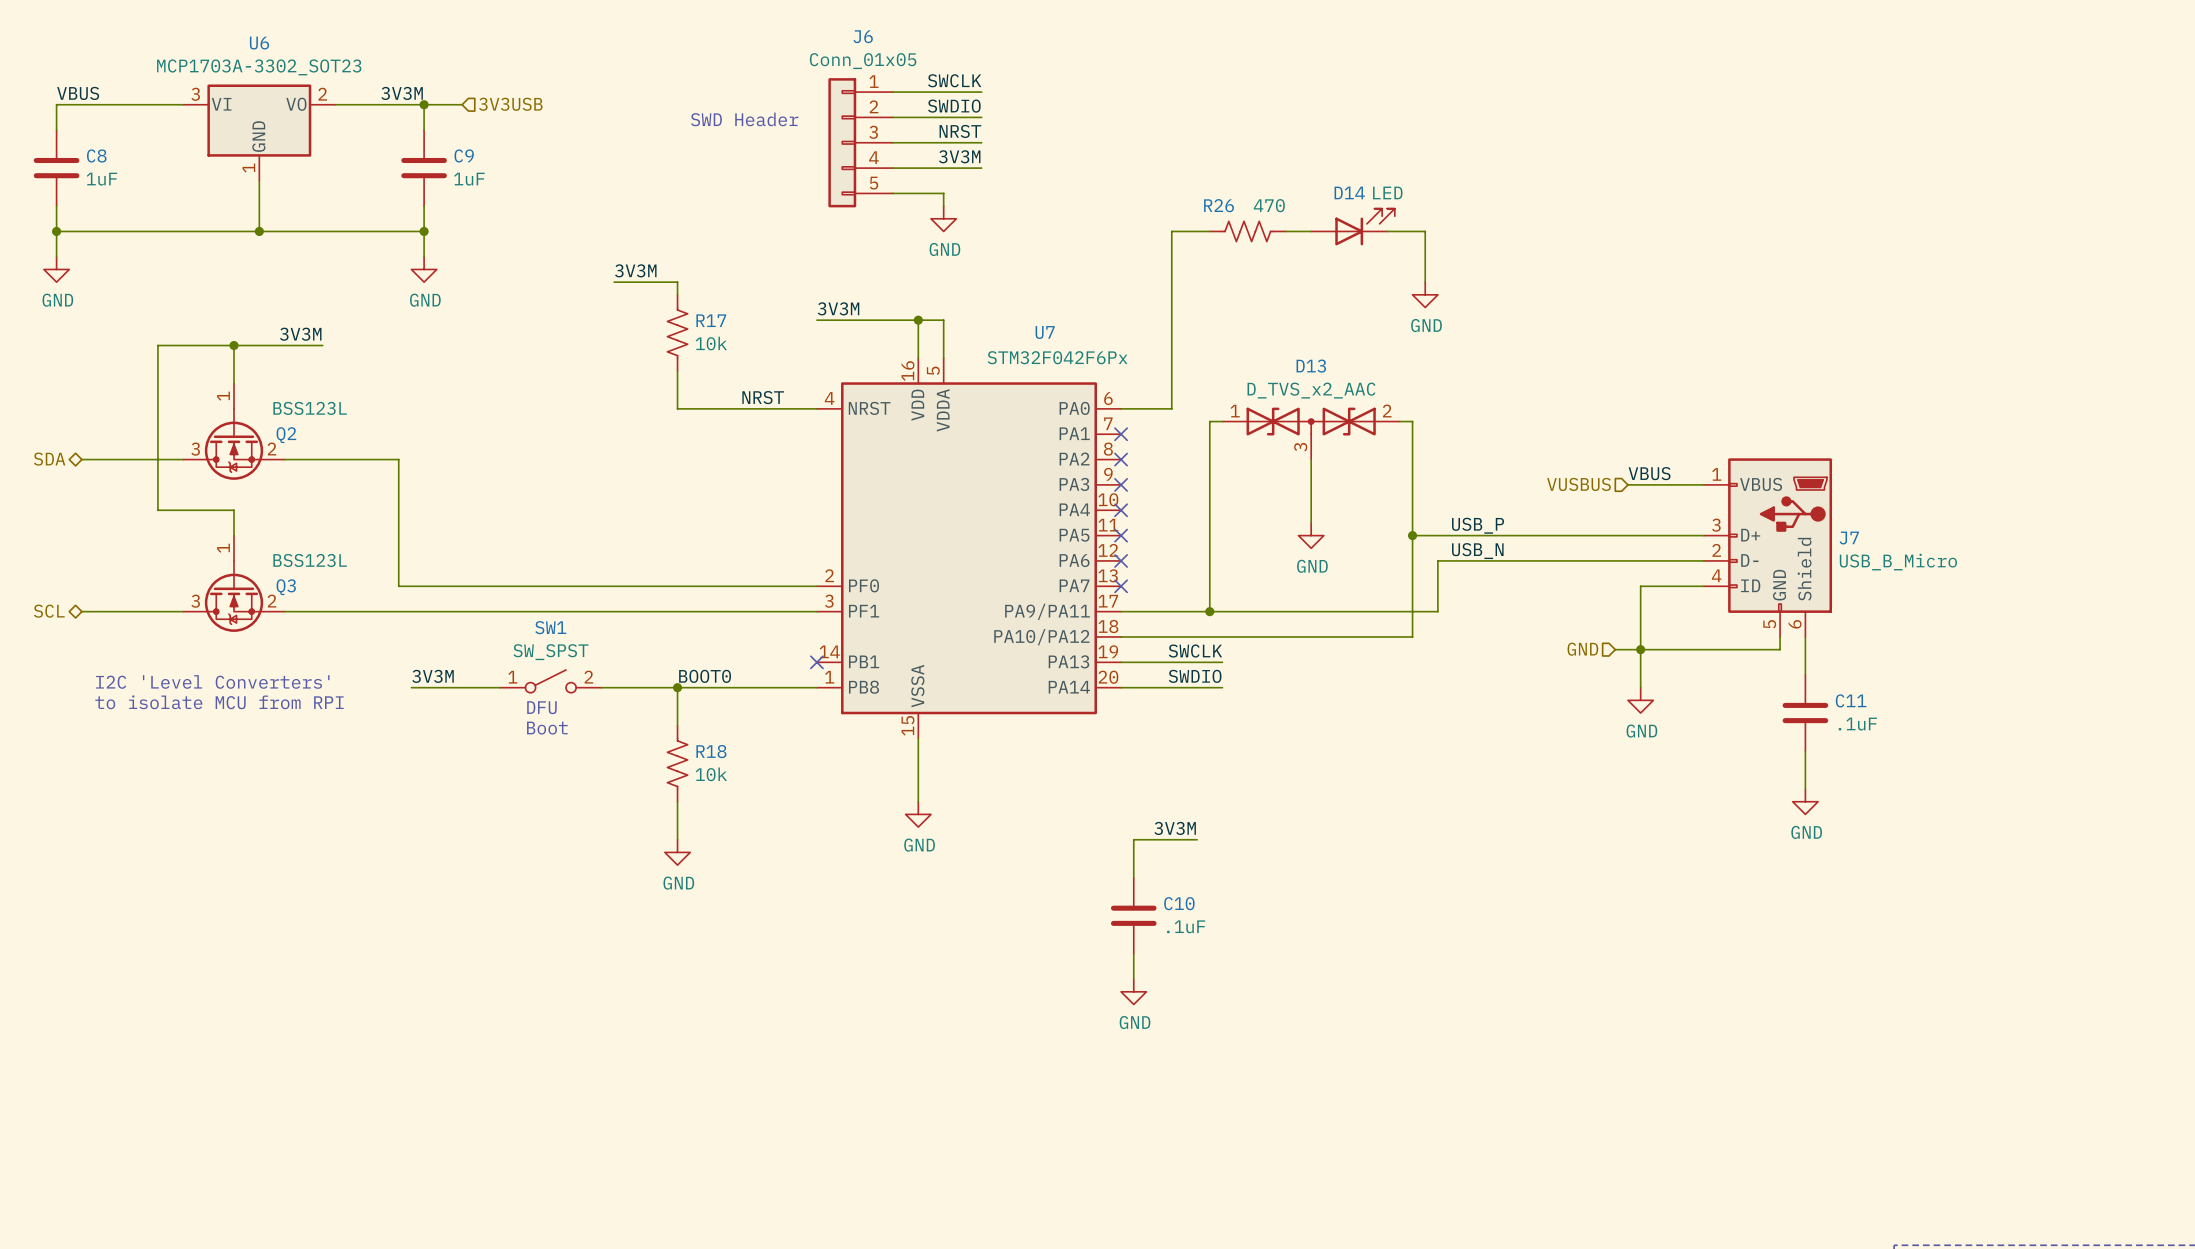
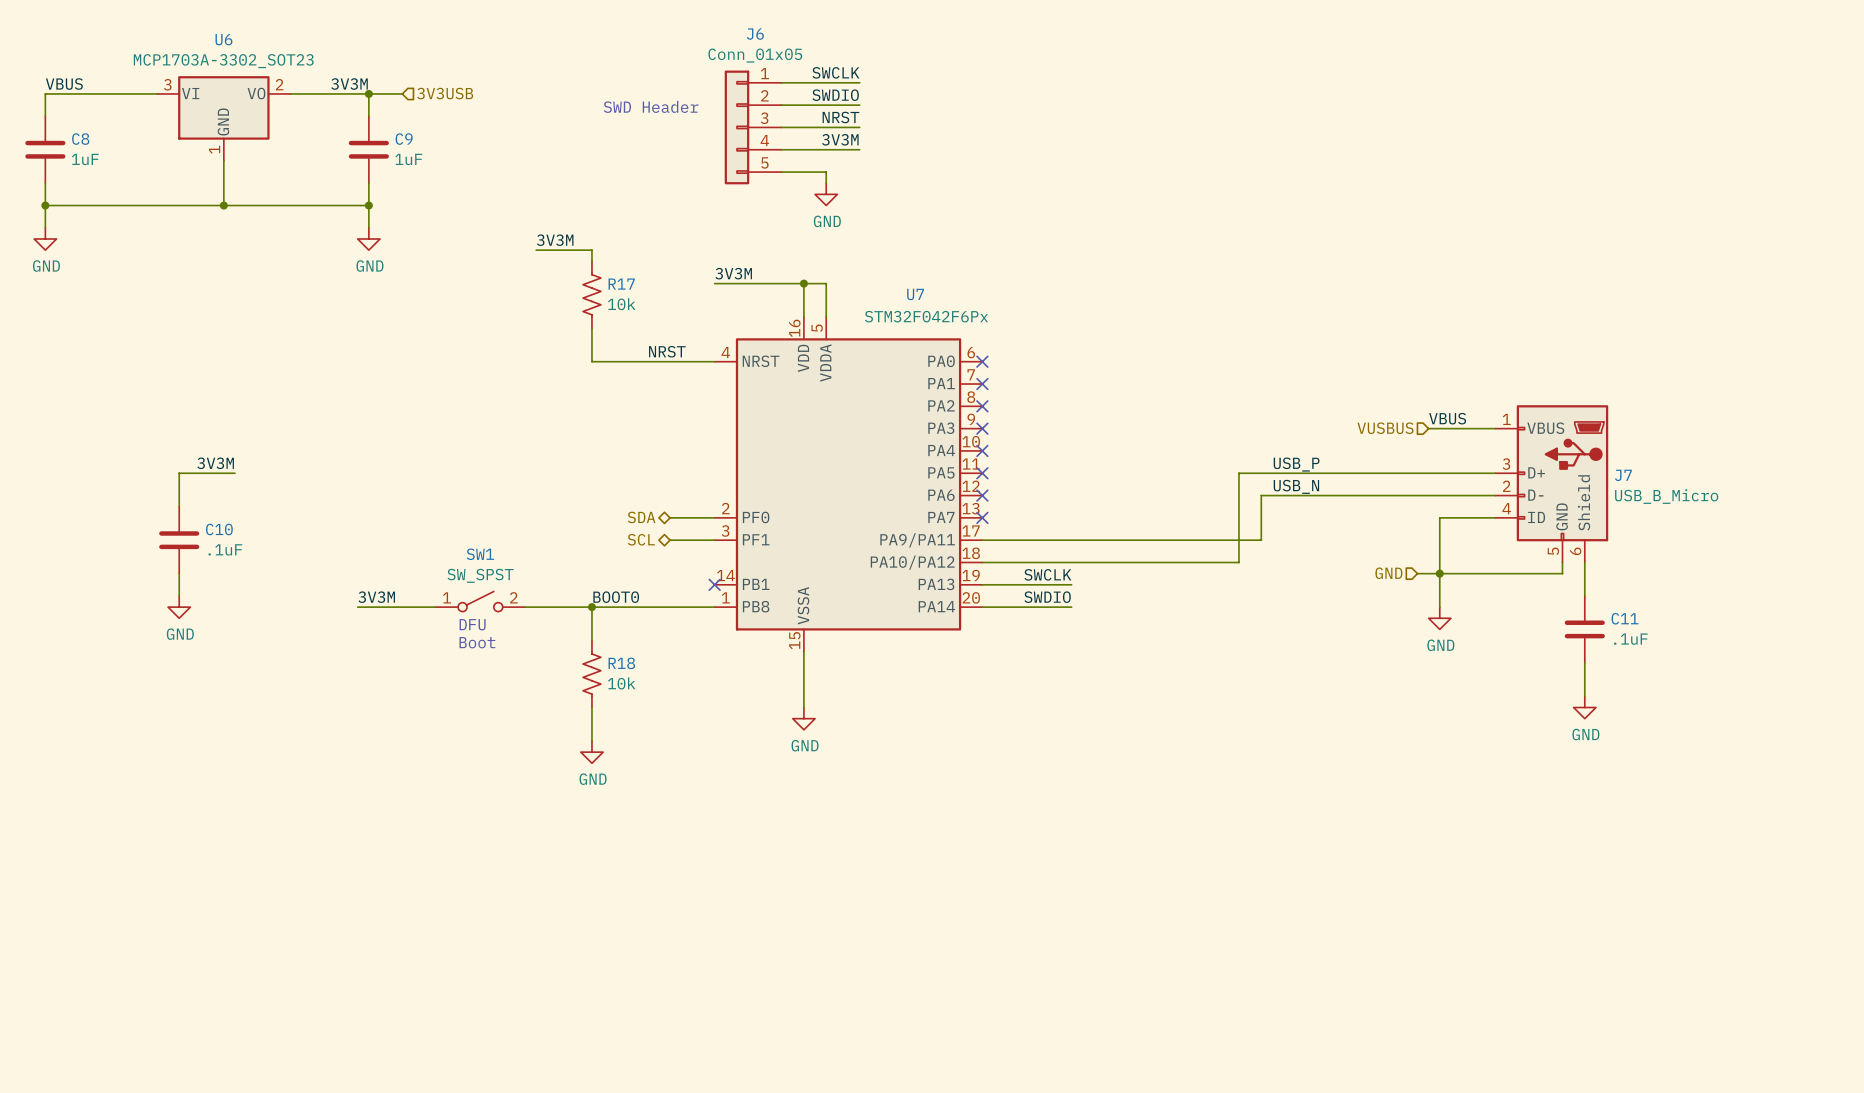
D14: LED (1352, 227) -> none
wire: (1209, 231) (1171, 231) (1171, 408) (1121, 408) -> none
R26: 470 (1247, 231) -> none
wire: (1285, 231) (1311, 231) -> none
wire: (1387, 231) (1425, 231) (1425, 282) -> none
power symbol: GND (1425, 294) -> none
label position: 3V3M (300, 334) -> 3V3M (215, 463)
wire: (233, 345) (233, 383) -> none
junction: (233, 345) -> none
wire: (322, 345) (157, 345) (157, 510) (233, 510) (233, 535) -> none
no-connect mark: none -> (982, 361)
wire: (1222, 421) (1209, 421) (1209, 611) -> none
wire: (1399, 421) (1412, 421) (1412, 535) -> none
Q2: BSS123L (233, 431) -> none
D13: D_TVS_x2_AAC (1311, 433) -> none
hierarchical label: SDA (49, 459) -> none
wire: (81, 459) (183, 459) -> none
wire: (284, 459) (398, 459) (398, 586) (766, 586) -> none
wire: (1311, 459) (1311, 522) -> none
wire: none -> (235, 473) (179, 473) (179, 506)
power symbol: GND (1311, 535) -> none
junction: (1412, 535) -> none
Q3: BSS123L (233, 583) -> none
hierarchical label: none -> SDA (641, 517)
hierarchical label: SCL (49, 611) -> none
wire: (81, 611) (183, 611) -> none
wire: (284, 611) (766, 611) -> none
hierarchical label: none -> SCL (641, 539)
junction: (1209, 611) -> none
wire: none -> (179, 573) (179, 595)
text: I2C 'Level Converters' (212, 681) -> none
power symbol: none -> GND (179, 607)
text: to isolate MCU from RPI (219, 702) -> none
label: 3V3M (1175, 828) -> none
wire: (1197, 839) (1133, 839) (1133, 877) -> none
C10 position: (1133, 915) -> (179, 540)
wire: (1133, 953) (1133, 979) -> none
power symbol: GND (1133, 991) -> none

